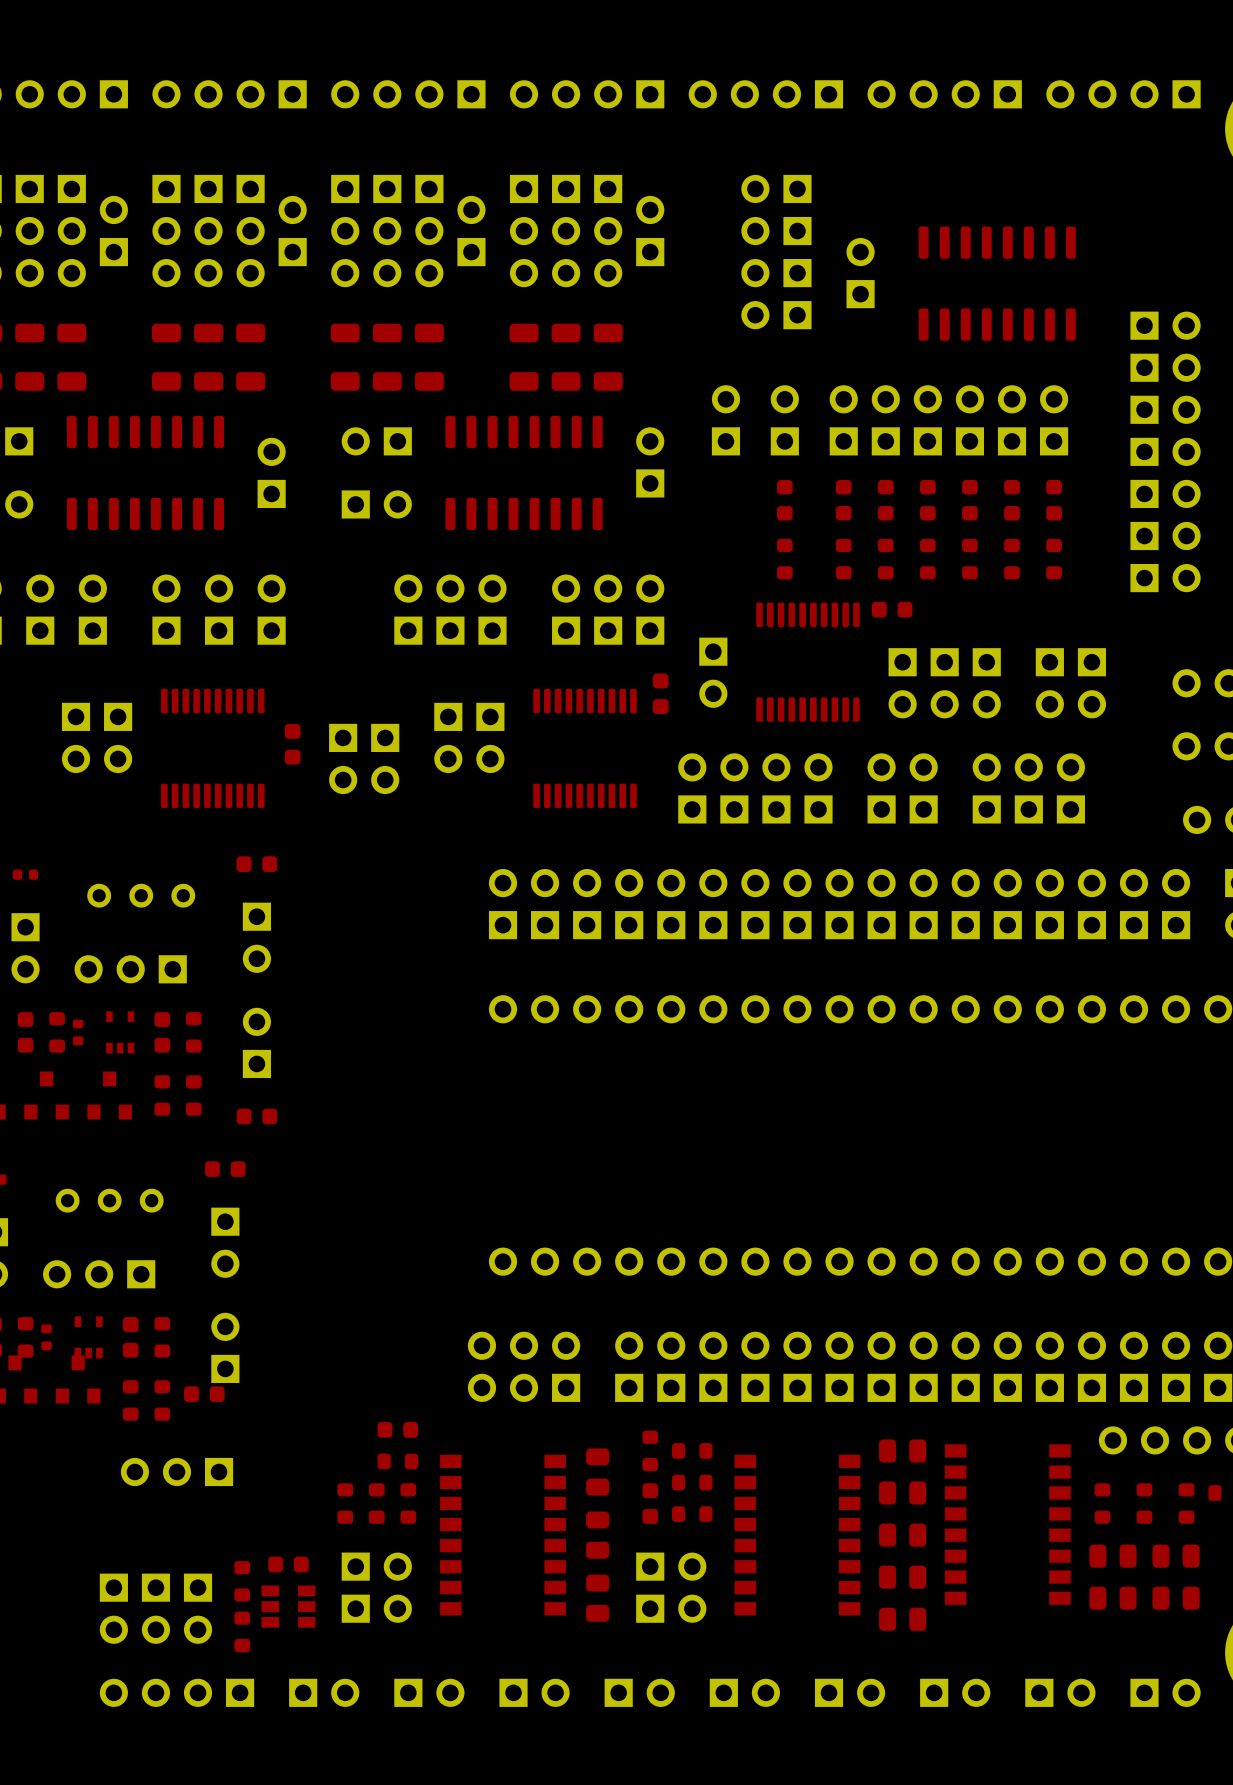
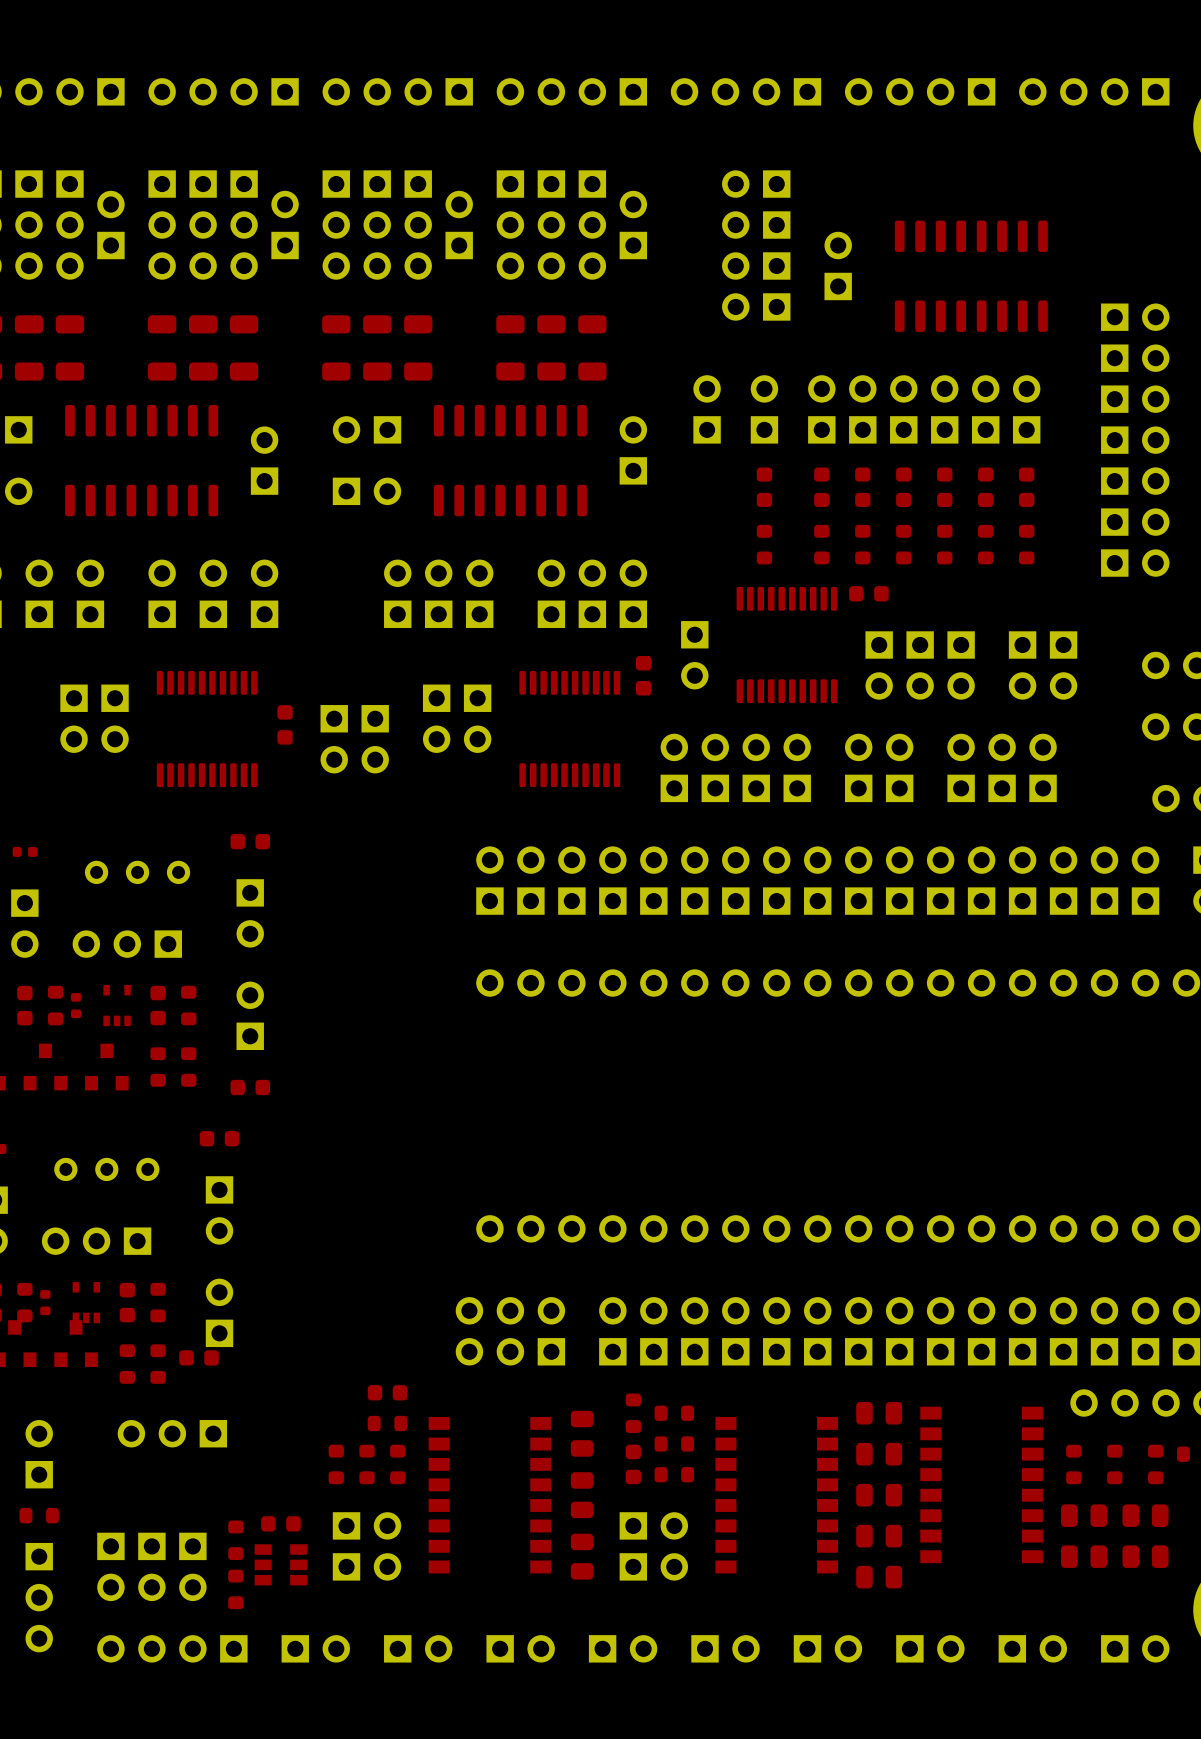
part: none -> (39, 1454)
part: none -> (39, 1515)
part: none -> (39, 1597)

